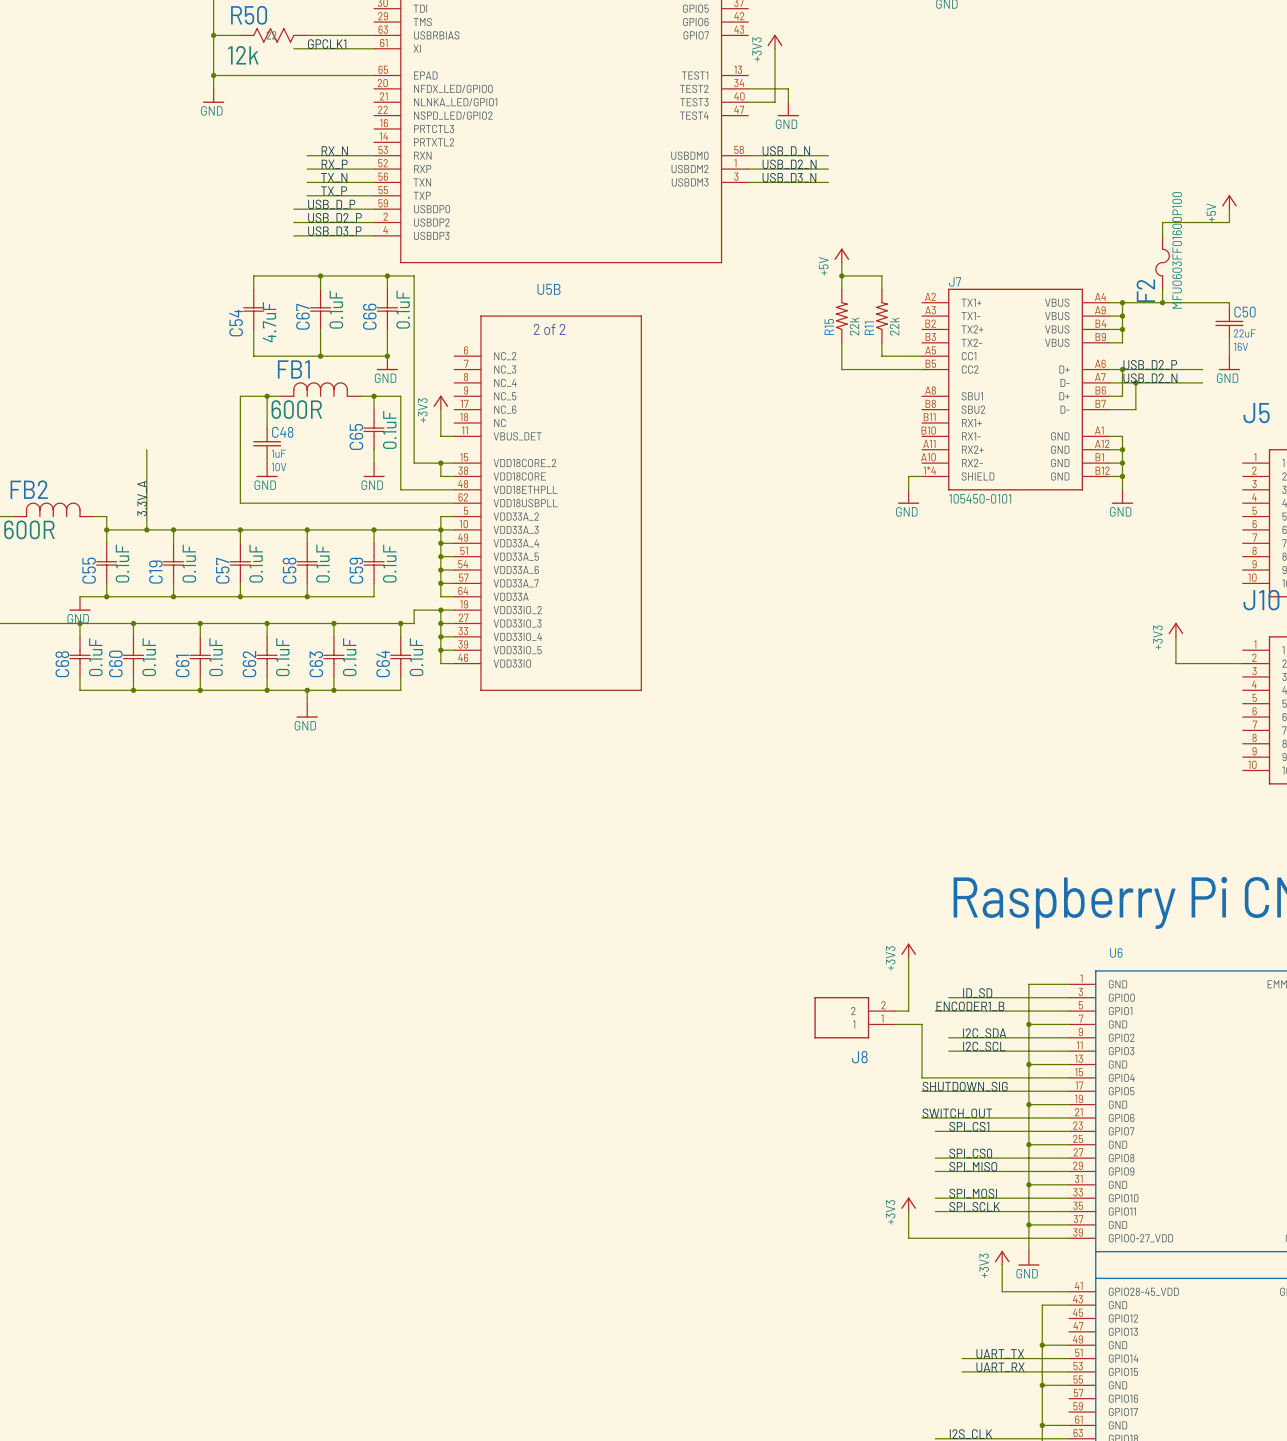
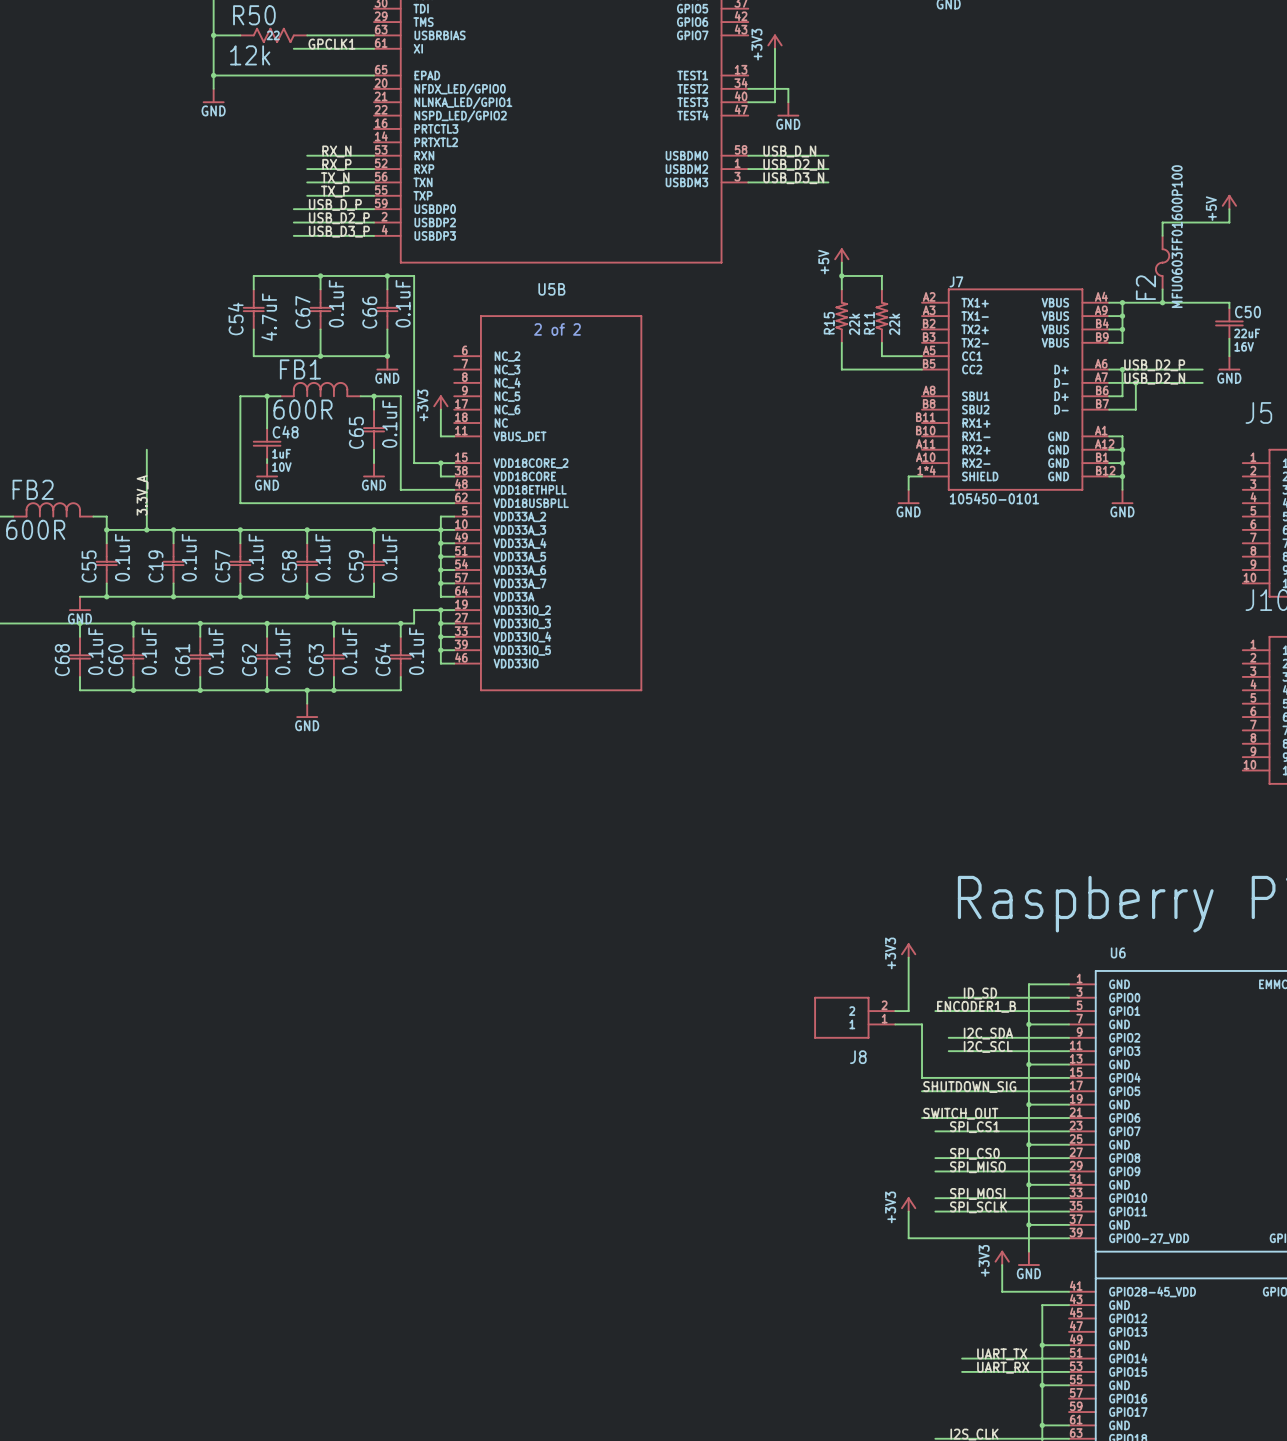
power symbol: +3V3 (1175, 629) -> none
wire: (1175, 636) (1175, 663) (1242, 663) -> none

